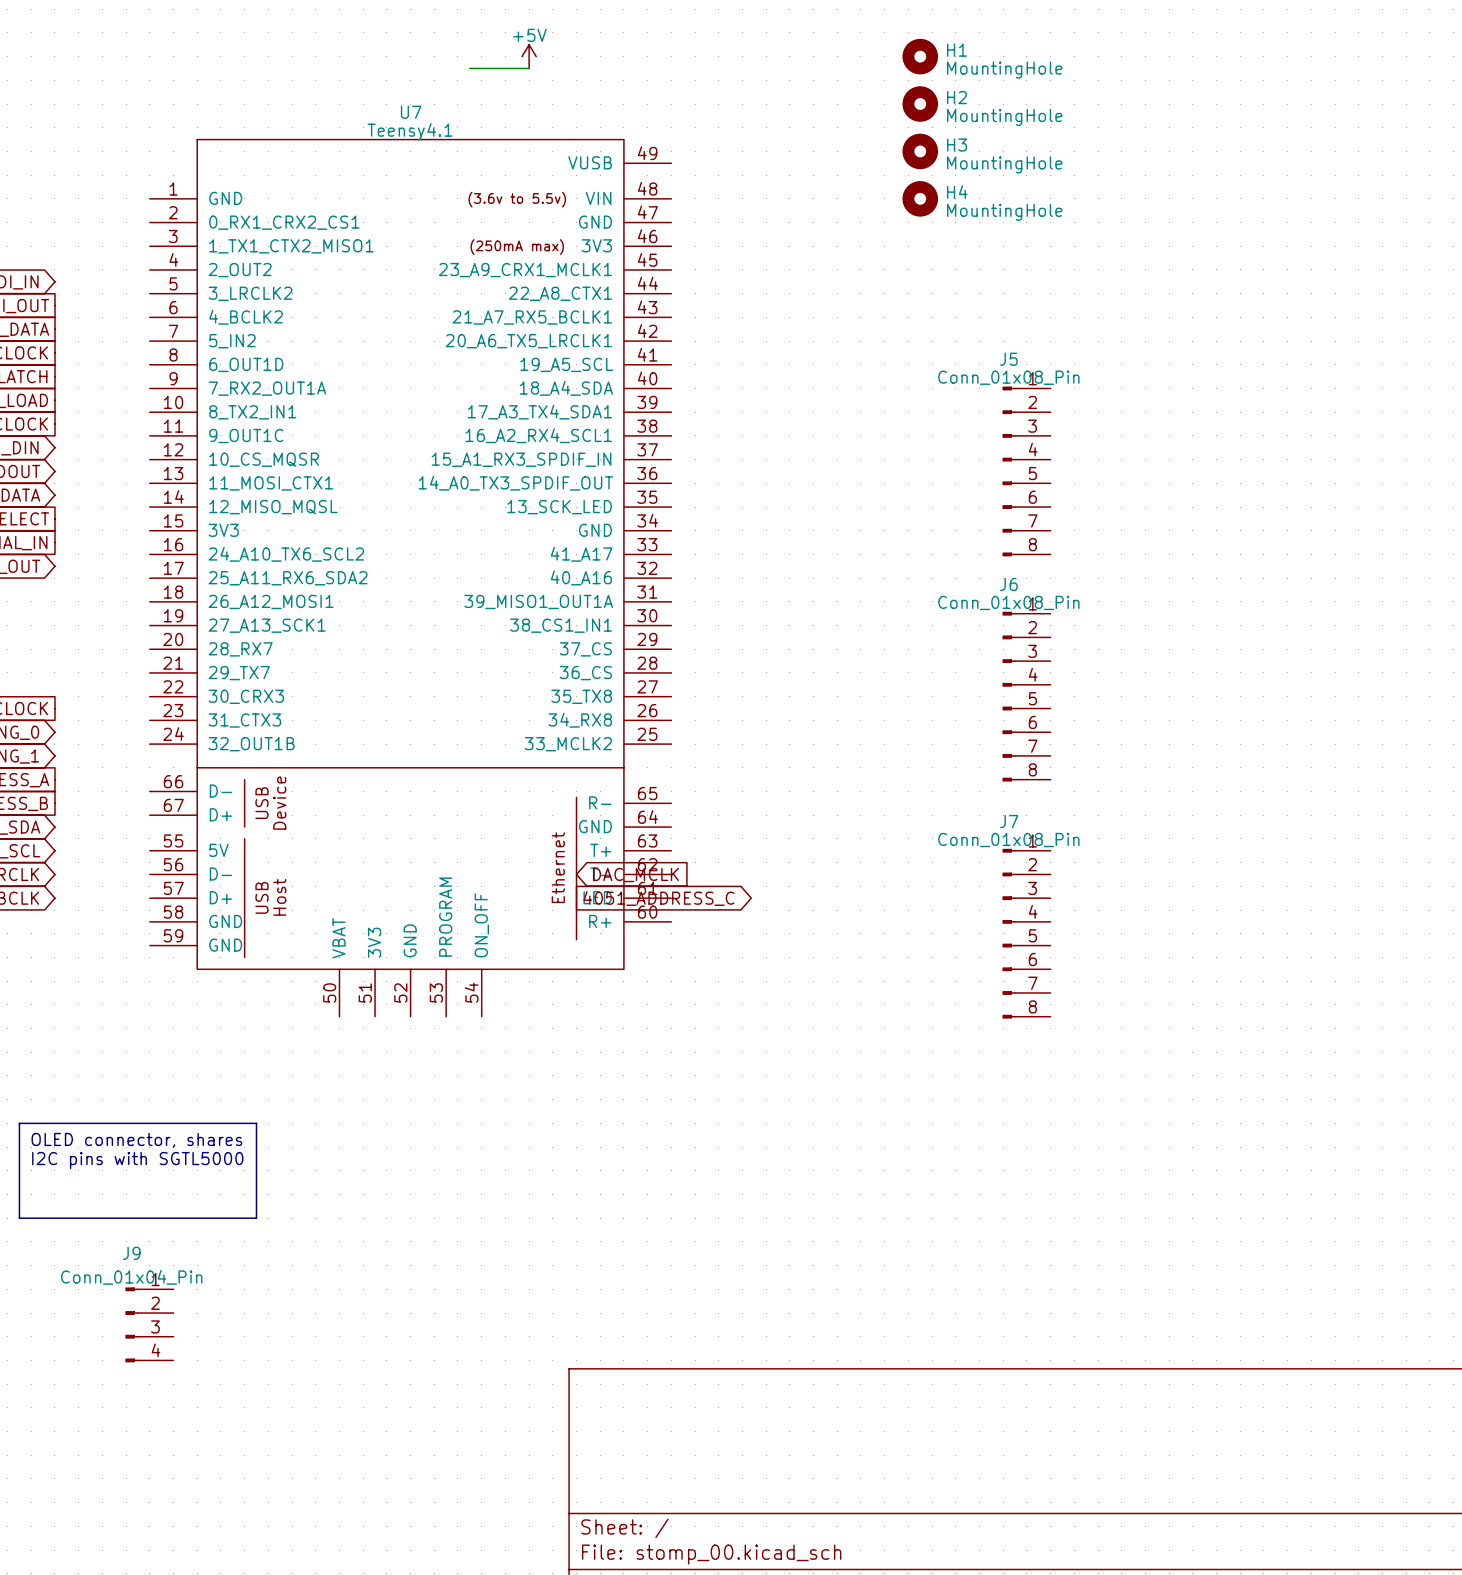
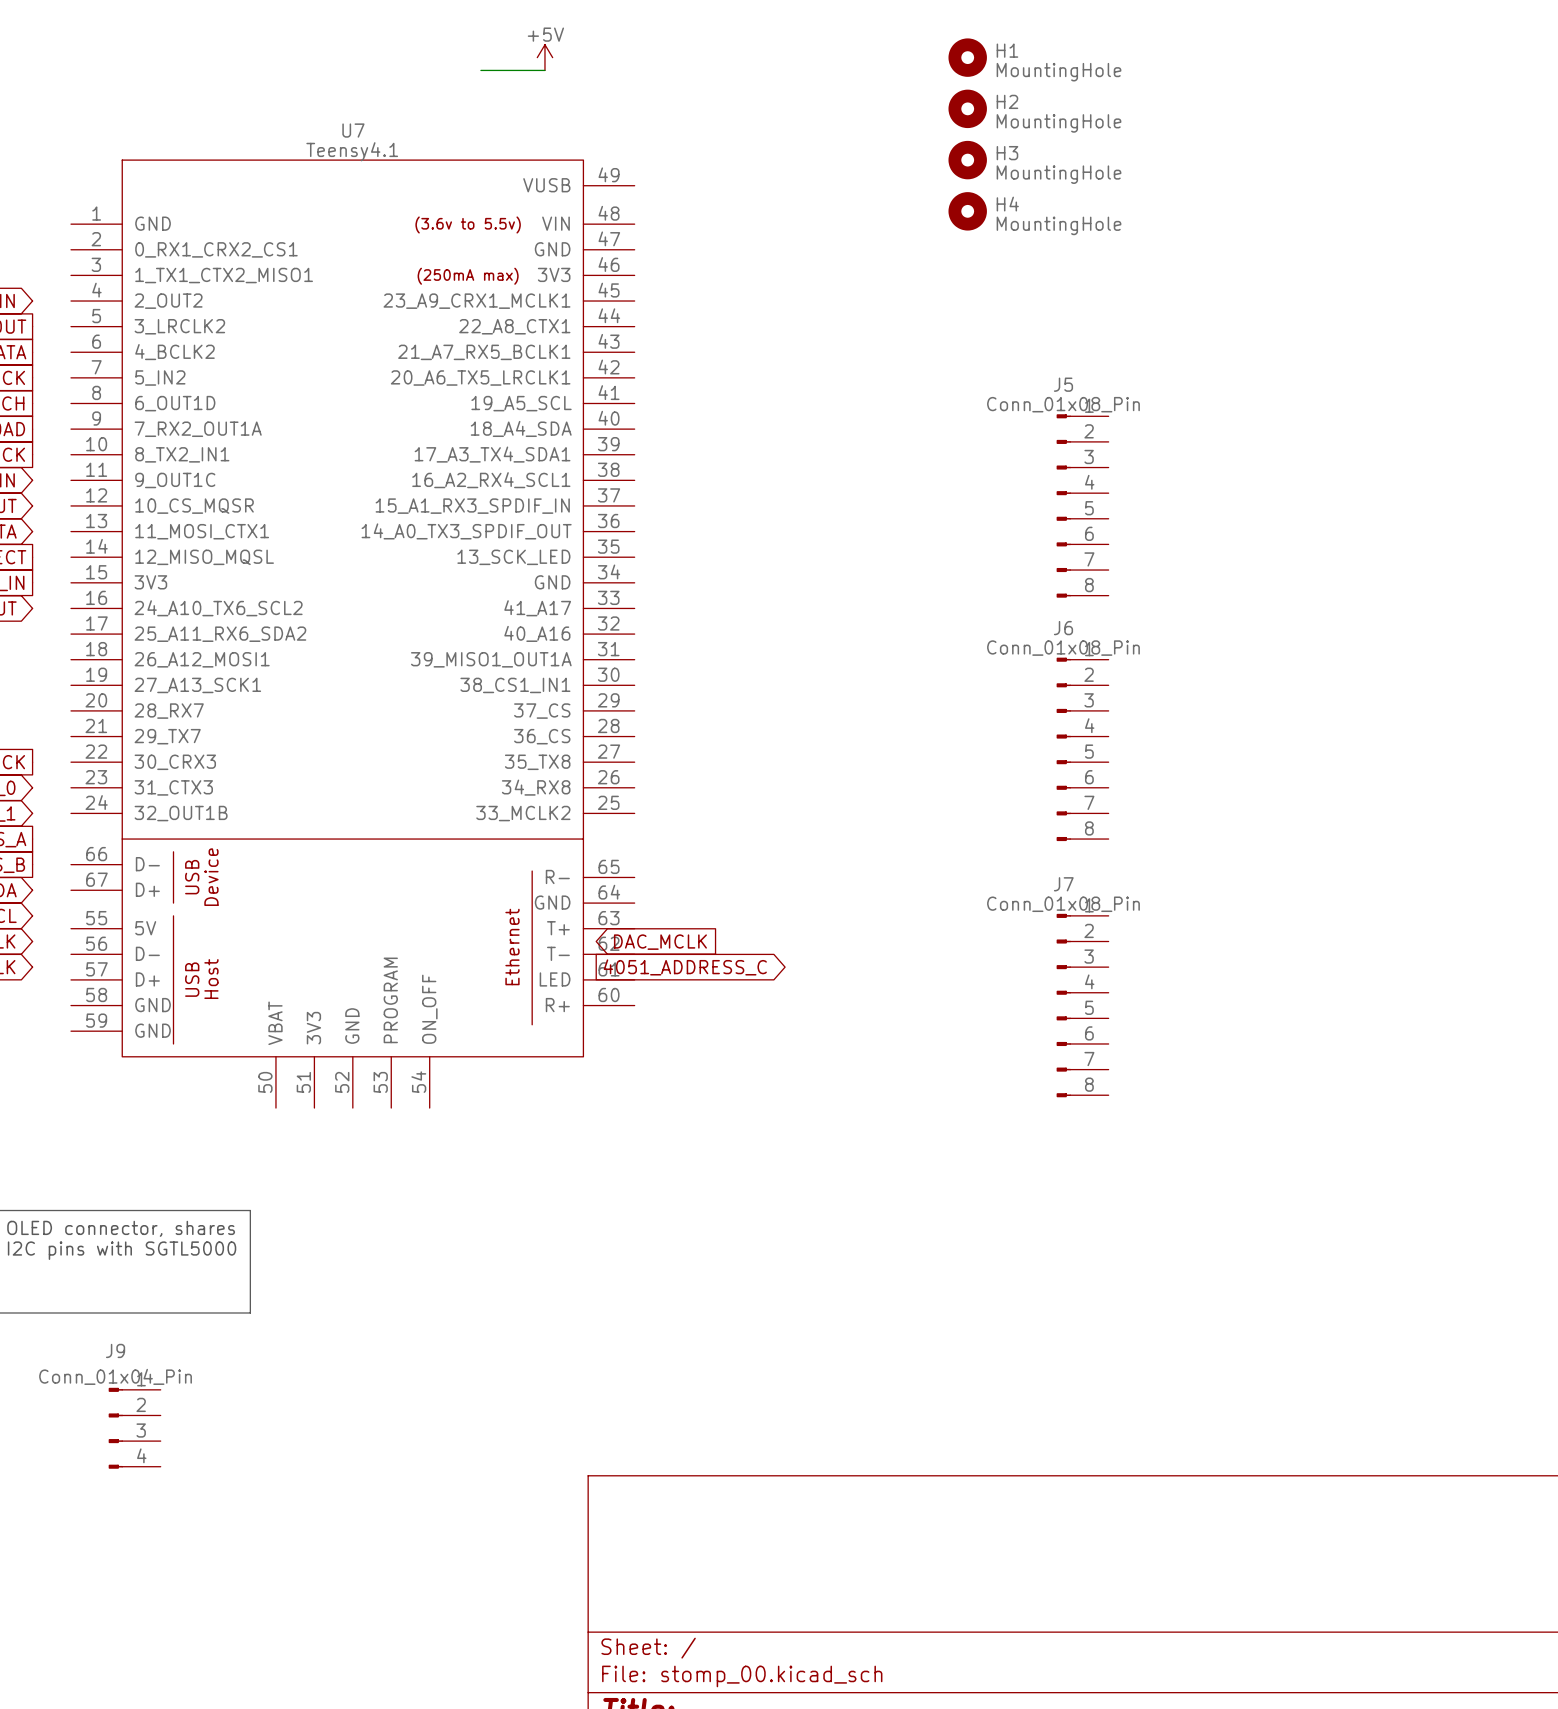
U7 position: (410, 578) -> (352, 634)

